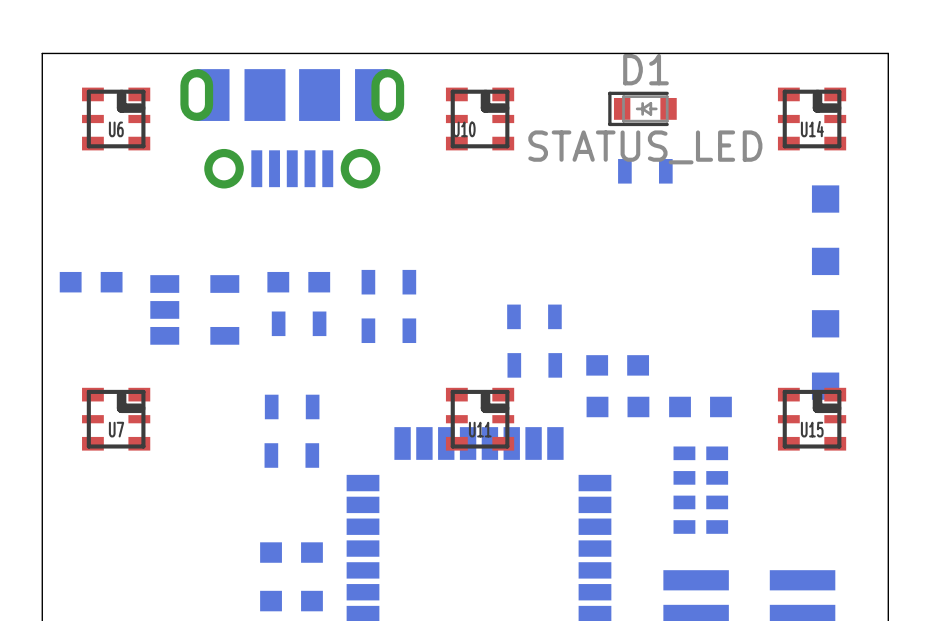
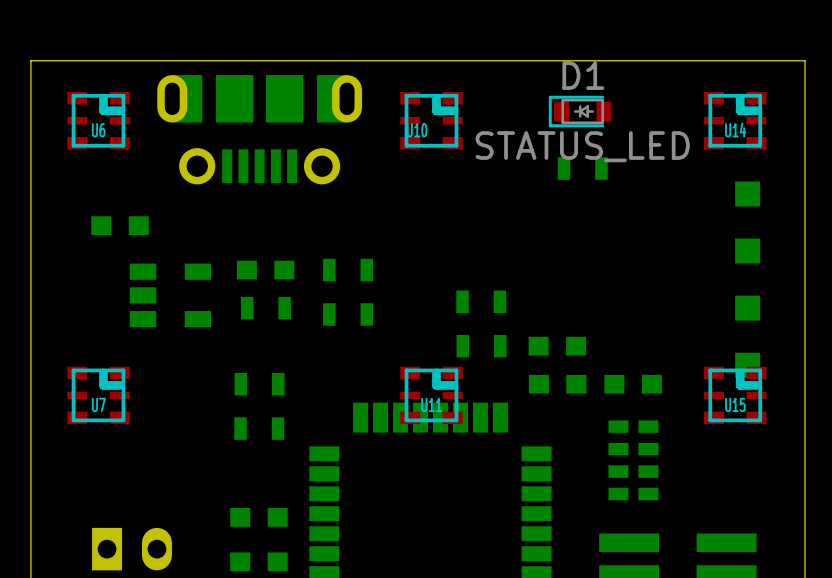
part position: (91, 282) -> (120, 225)
part: none -> (132, 549)

